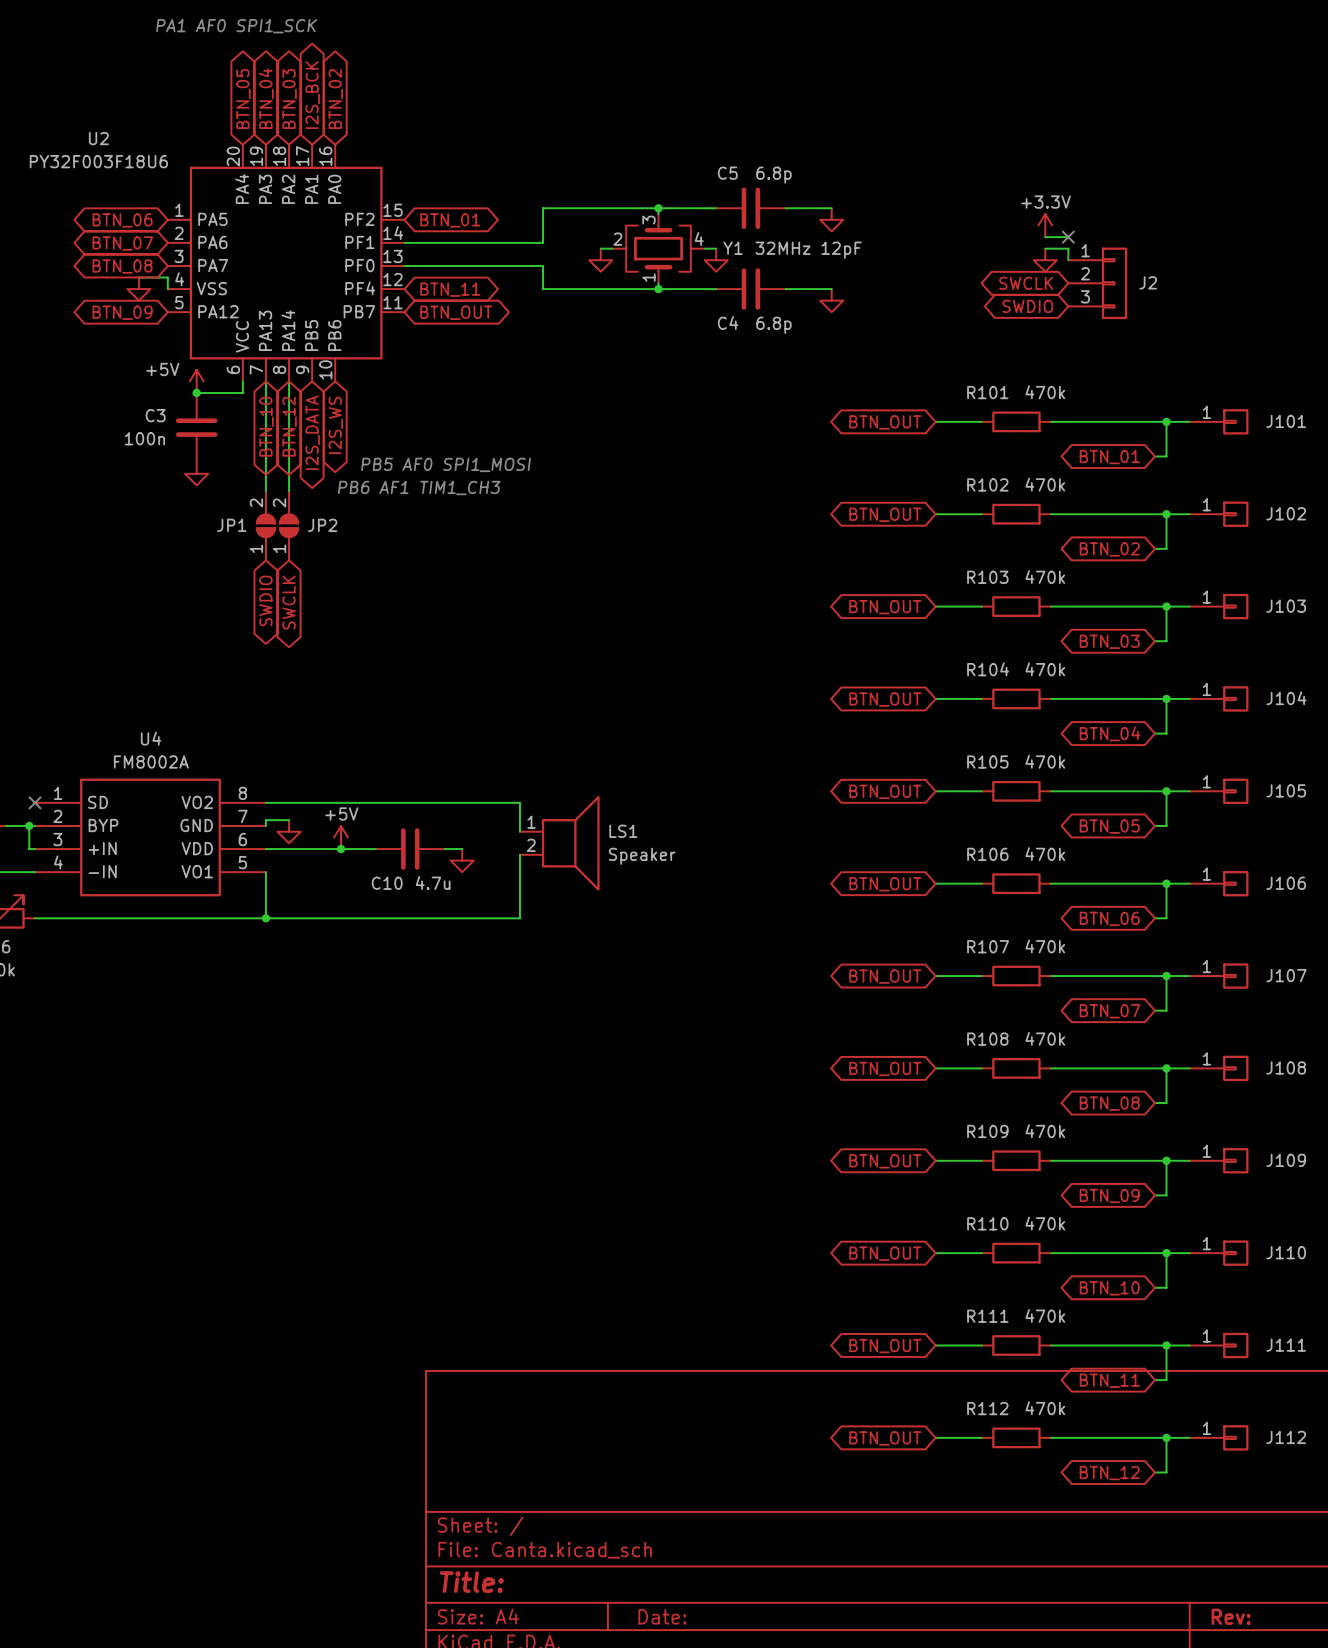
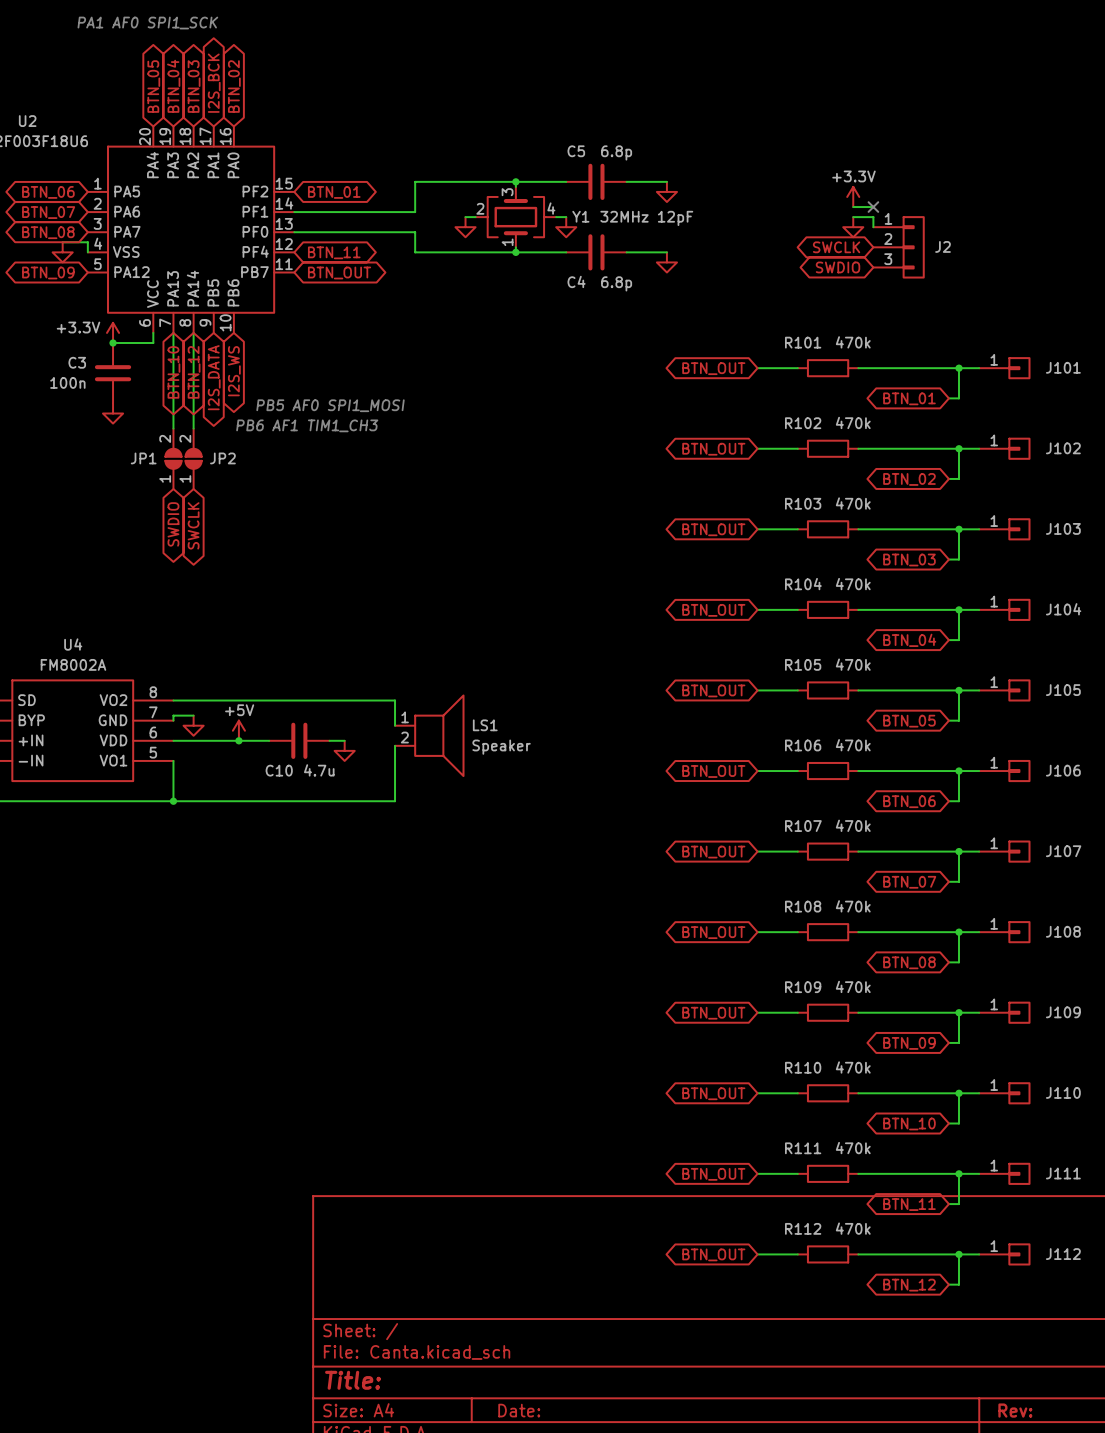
power symbol: +5V (196, 381) -> +3.3V (113, 332)

